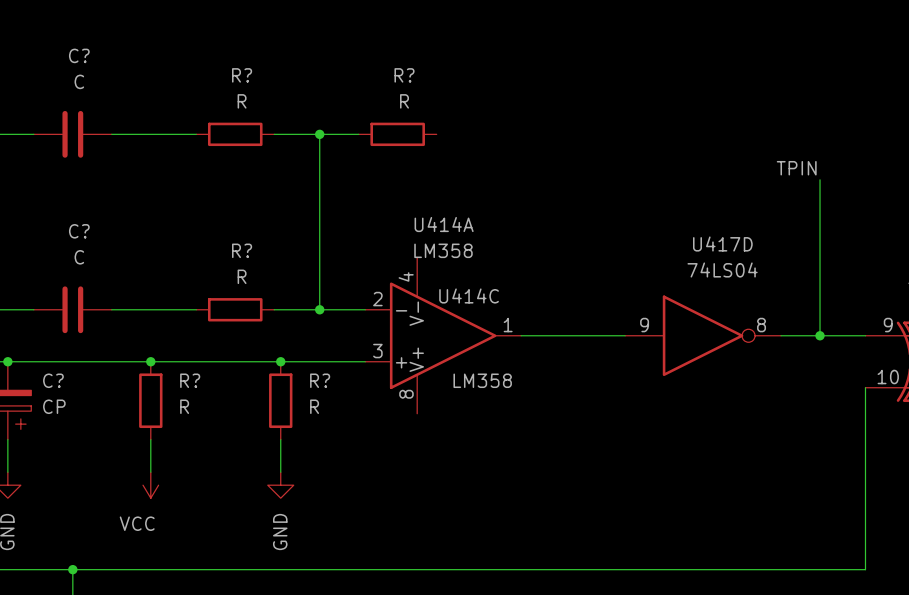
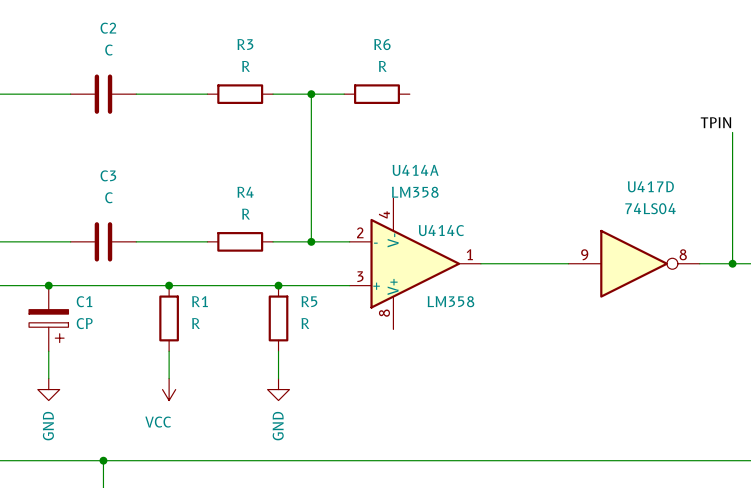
C? name: C? (79, 55) -> C2 (108, 28)
R? name: R? (242, 75) -> R3 (245, 44)
R? name: R? (404, 75) -> R6 (382, 44)
C? name: C? (79, 231) -> C3 (108, 175)
R? name: R? (242, 250) -> R4 (245, 192)
C? name: C? (53, 380) -> C1 (84, 301)
R? name: R? (190, 380) -> R1 (200, 301)
R? name: R? (320, 380) -> R5 (309, 301)

